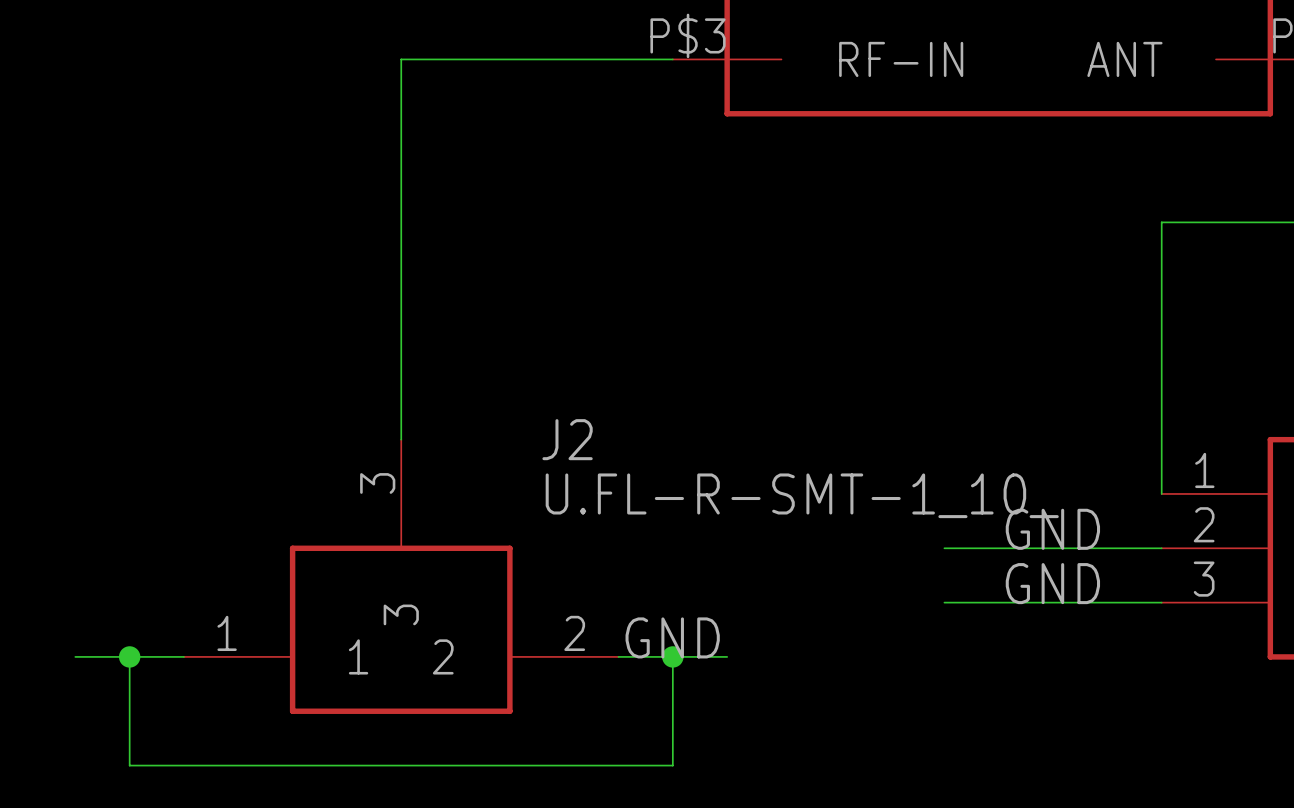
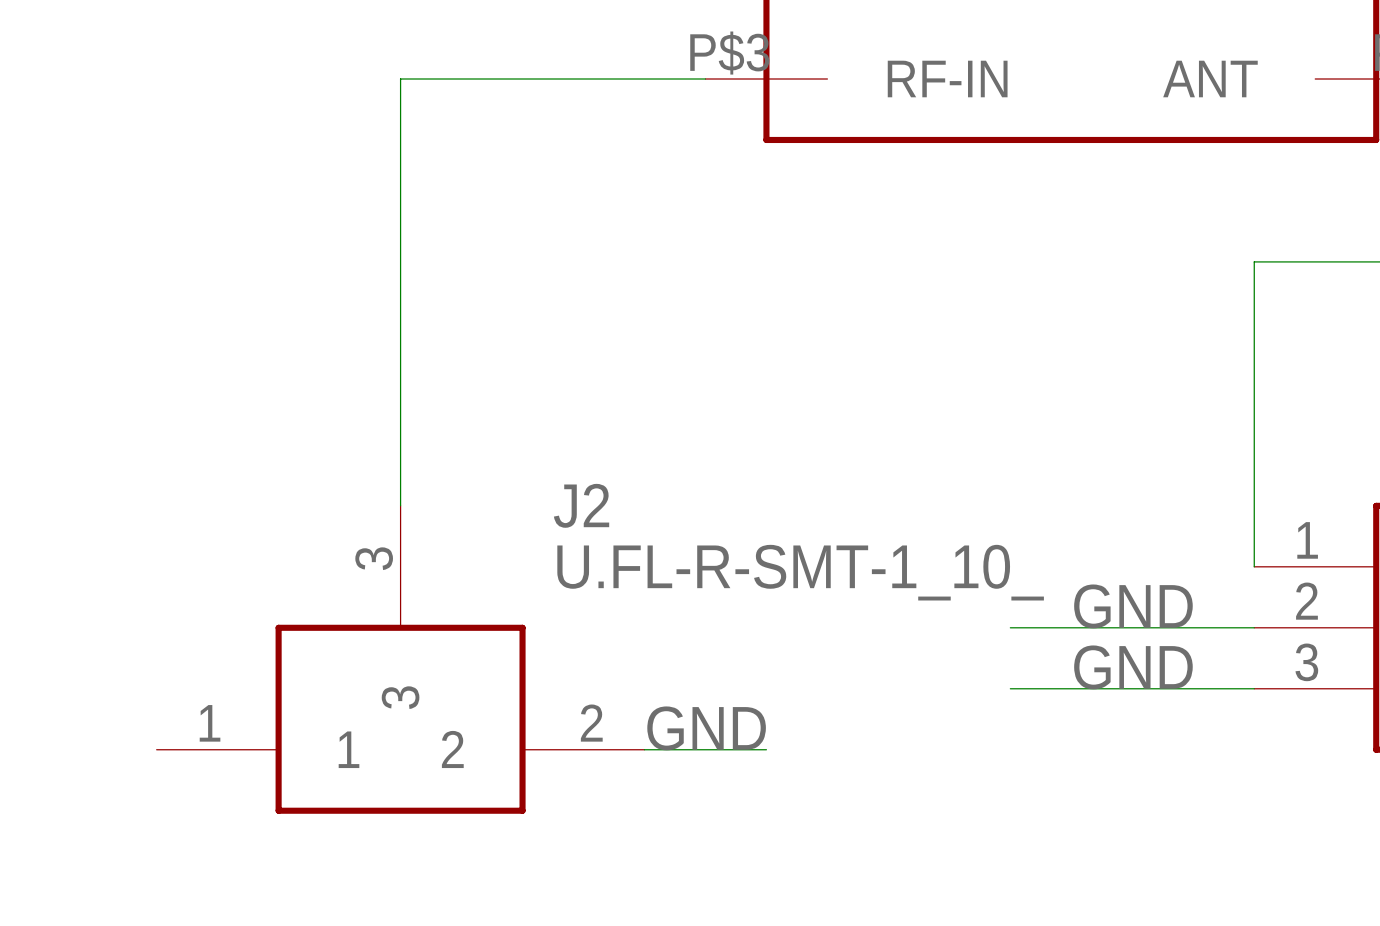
wire: (75, 656) (183, 656) -> none
wire: (129, 656) (129, 765) (672, 765) (672, 656) -> none
junction: (129, 656) -> none
junction: (672, 656) -> none

